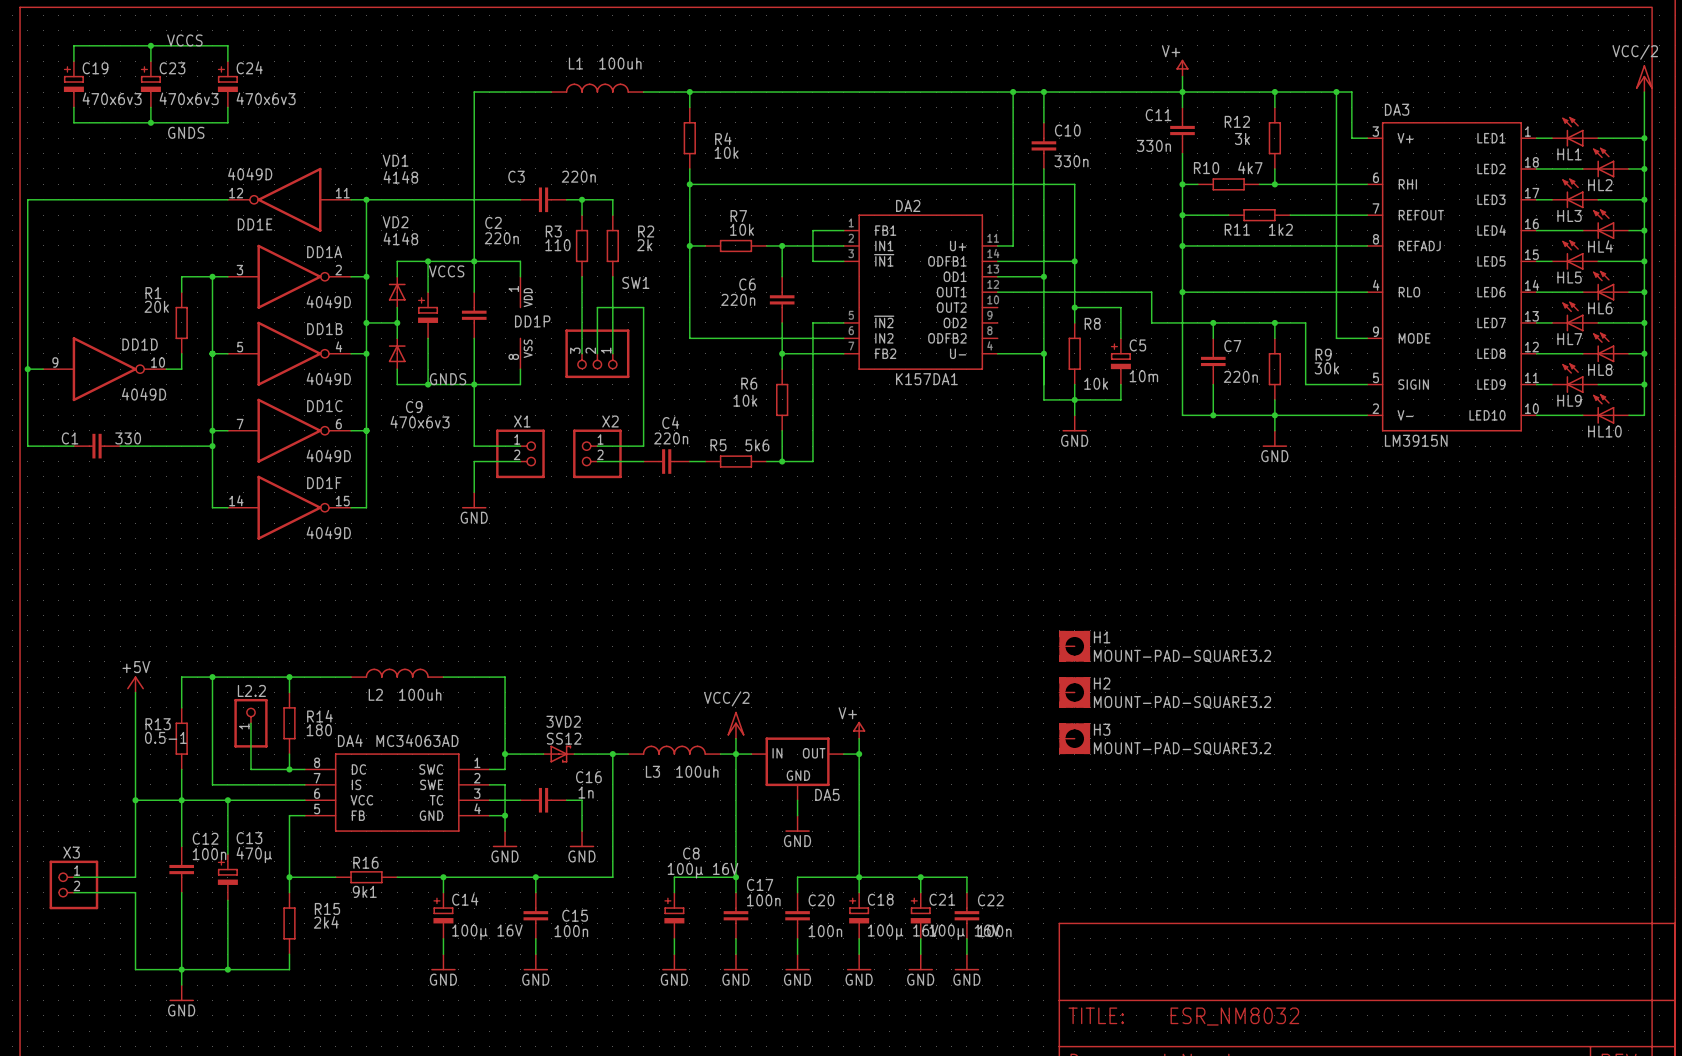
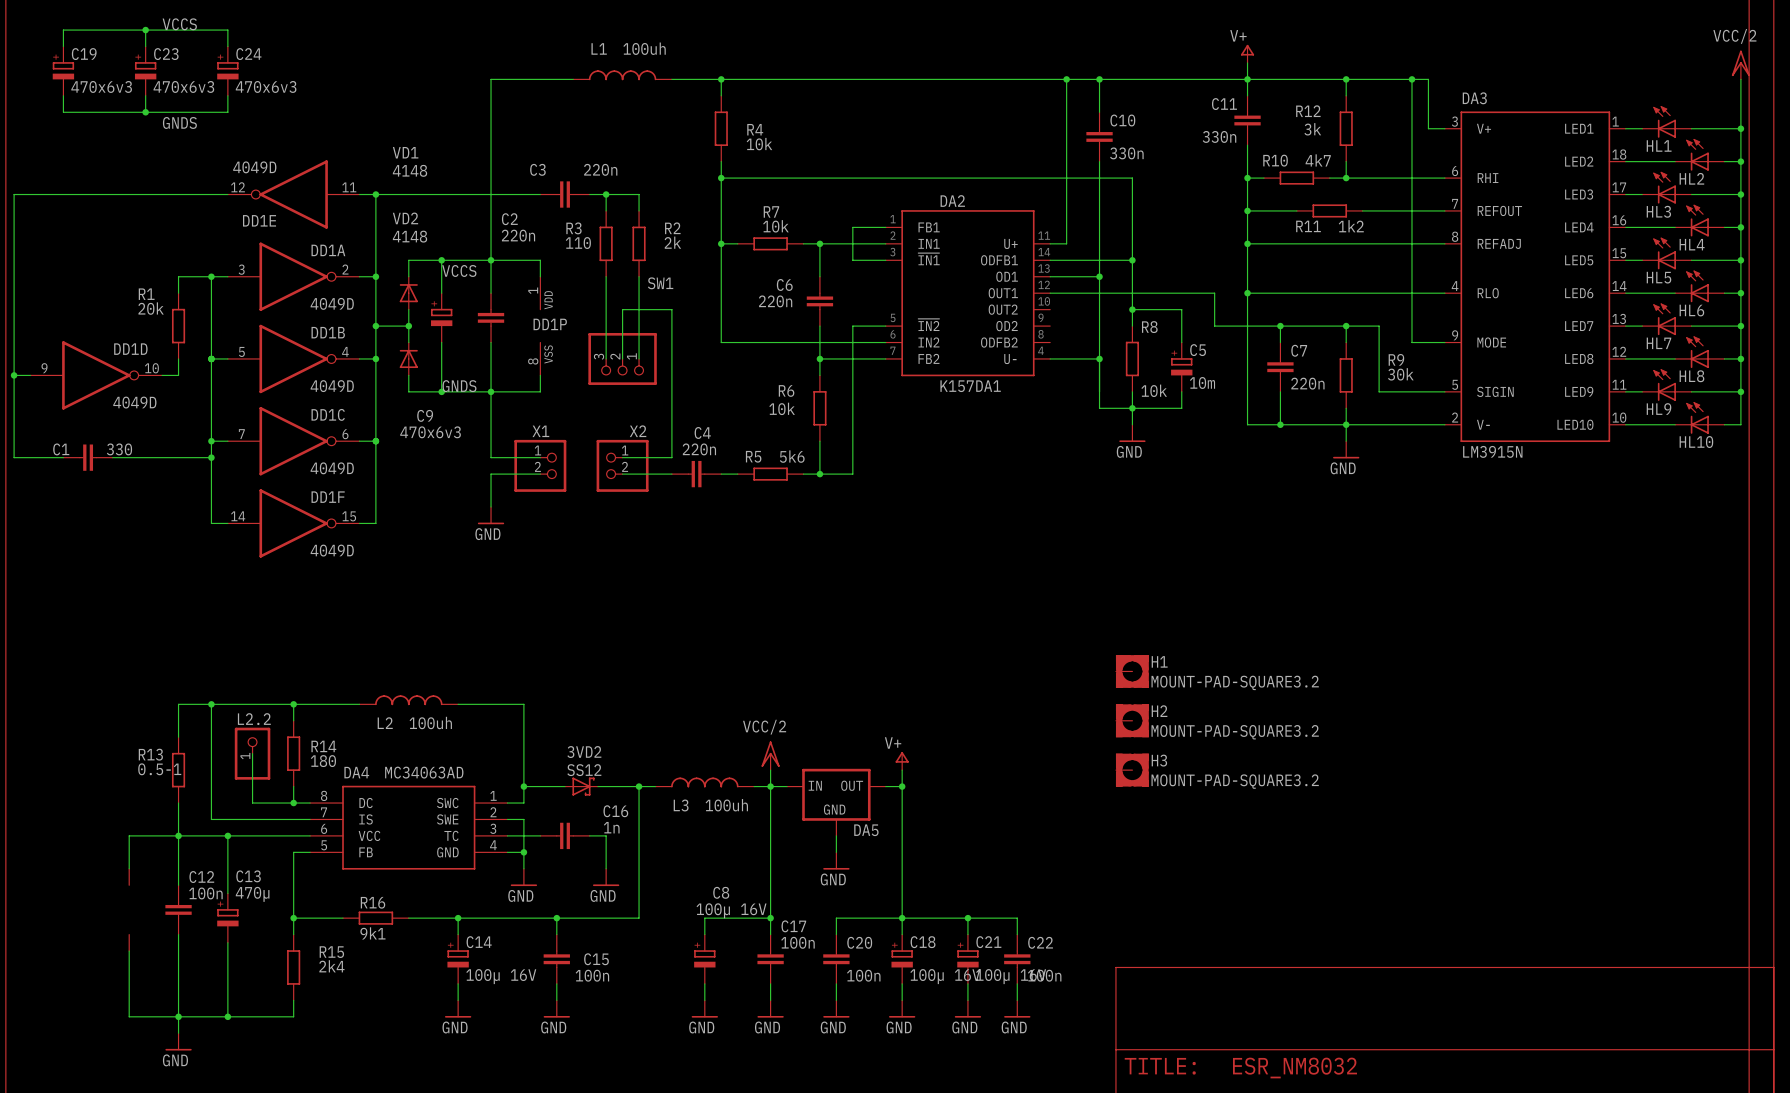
power symbol: +5V (135, 684) -> none
wire: (135, 692) (135, 800) -> none
junction: (135, 800) -> none
wire: (135, 831) (135, 877) (73, 877) -> none
part: none -> (129, 877)
X3: (73, 884) -> none
wire: (73, 892) (135, 892) (135, 908) -> none
part: none -> (129, 942)

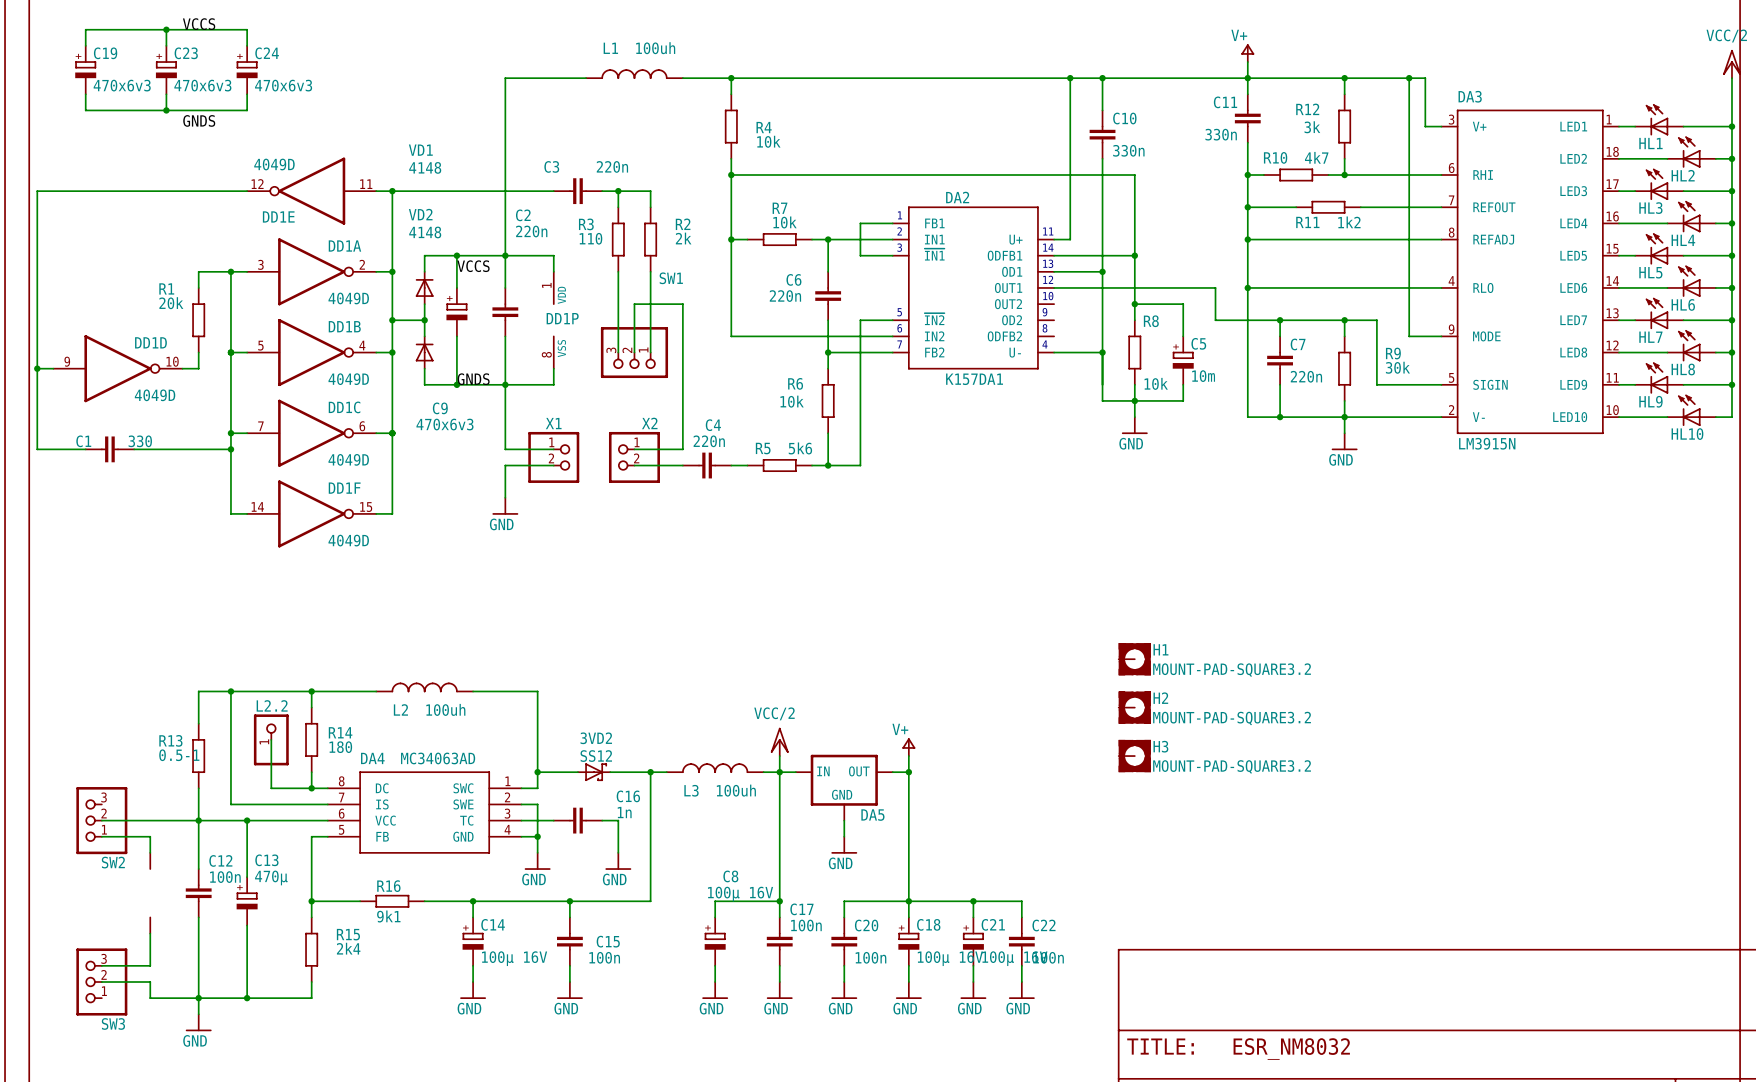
SW2: none -> (101, 820)
wire: (129, 835) (129, 852) -> (150, 820) (101, 820)
wire: none -> (101, 836) (150, 836)
wire: (129, 983) (129, 1000) -> (150, 965) (101, 965)
wire: none -> (101, 982) (150, 982)
SW3: none -> (101, 982)

